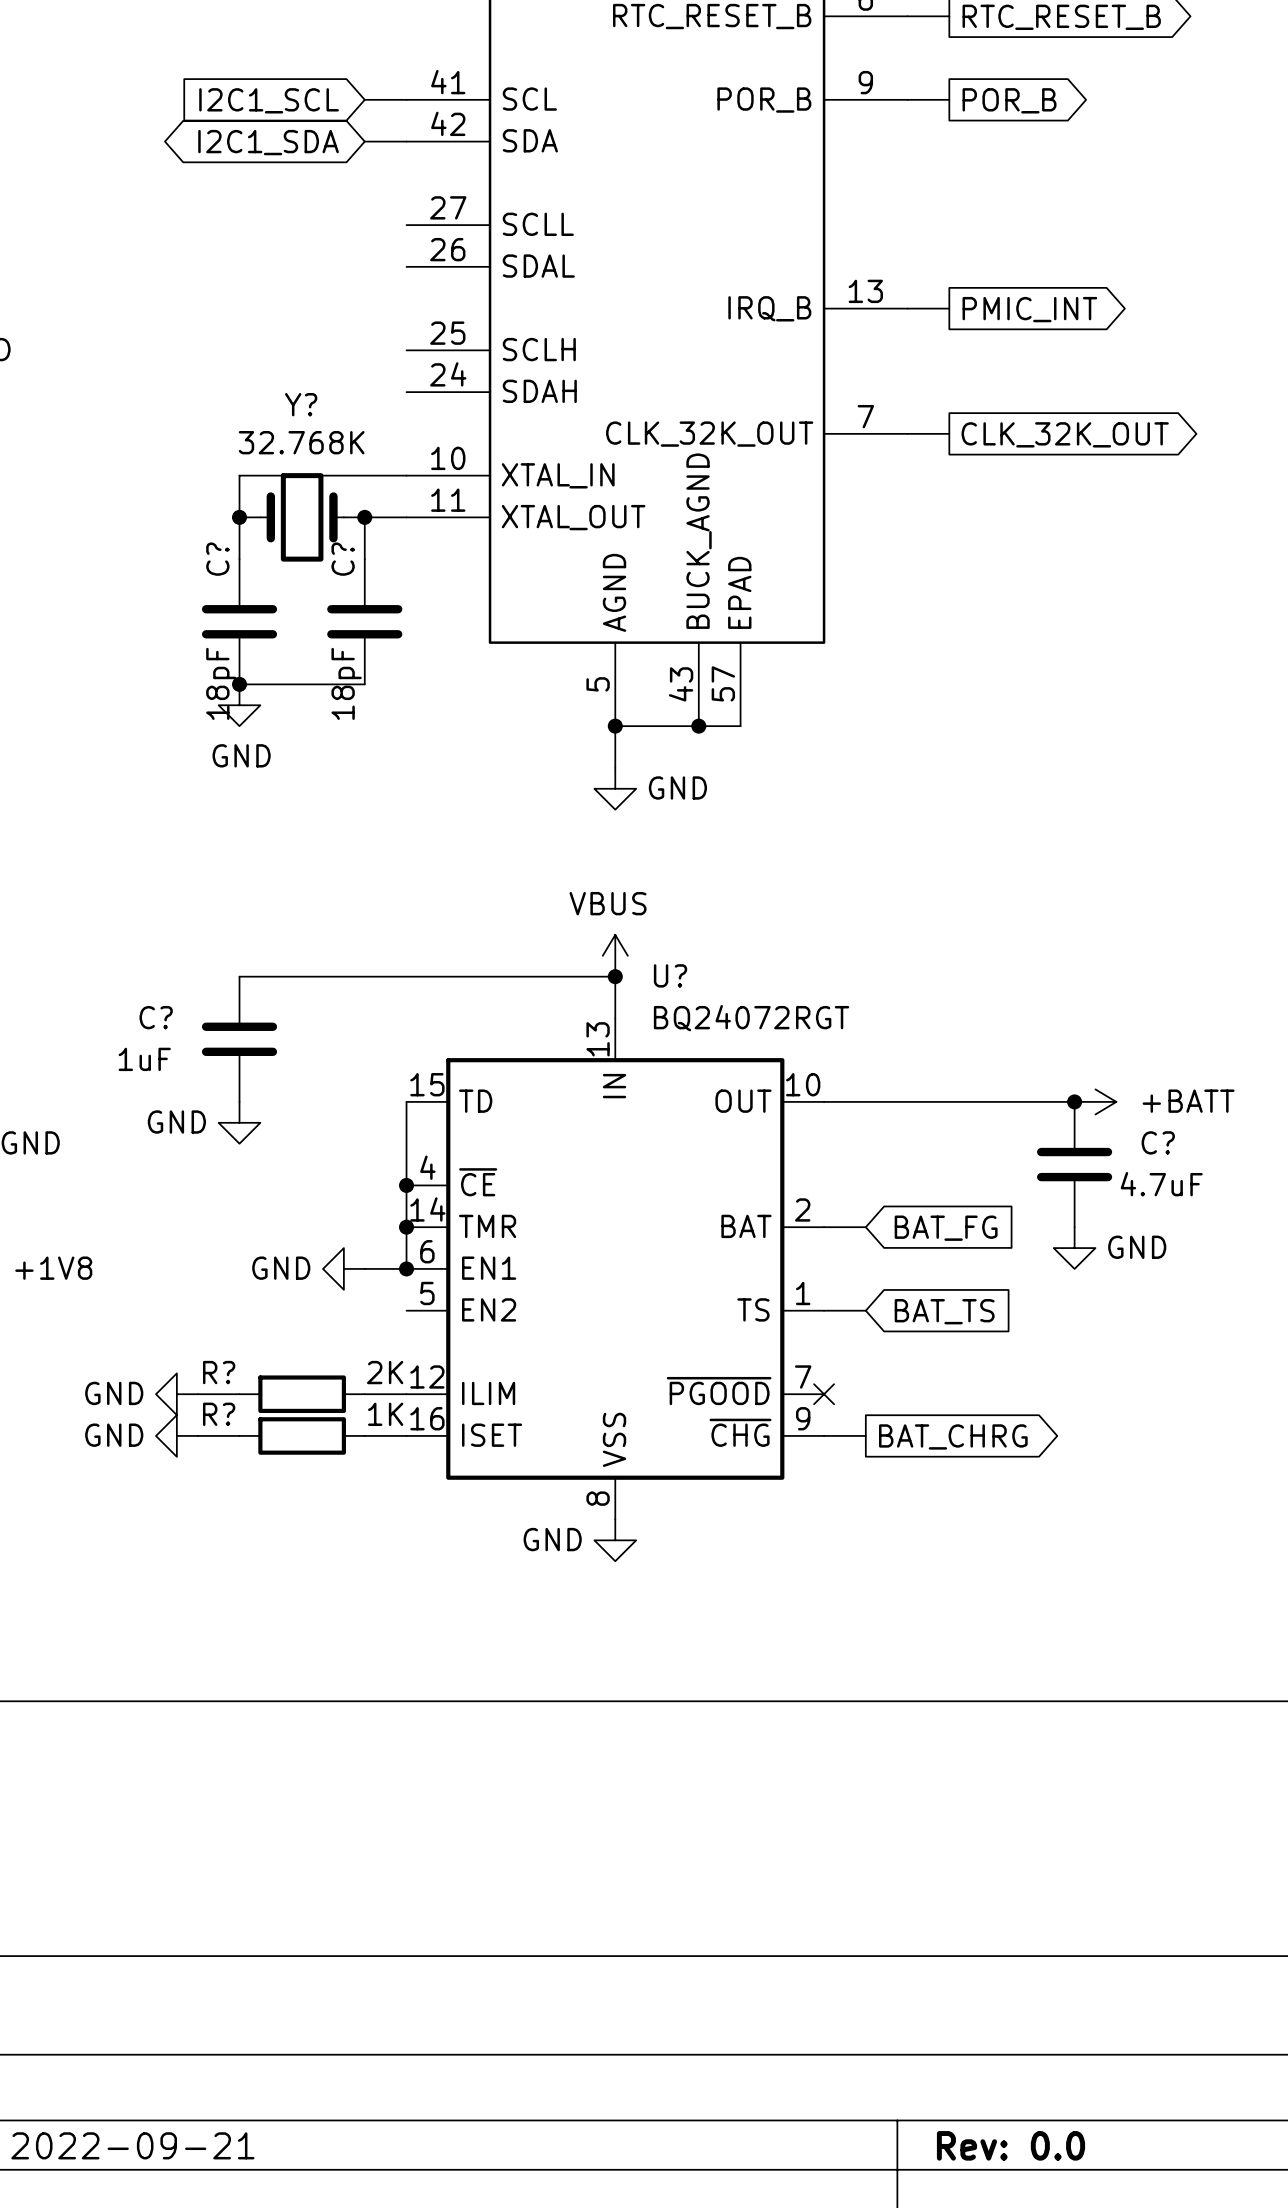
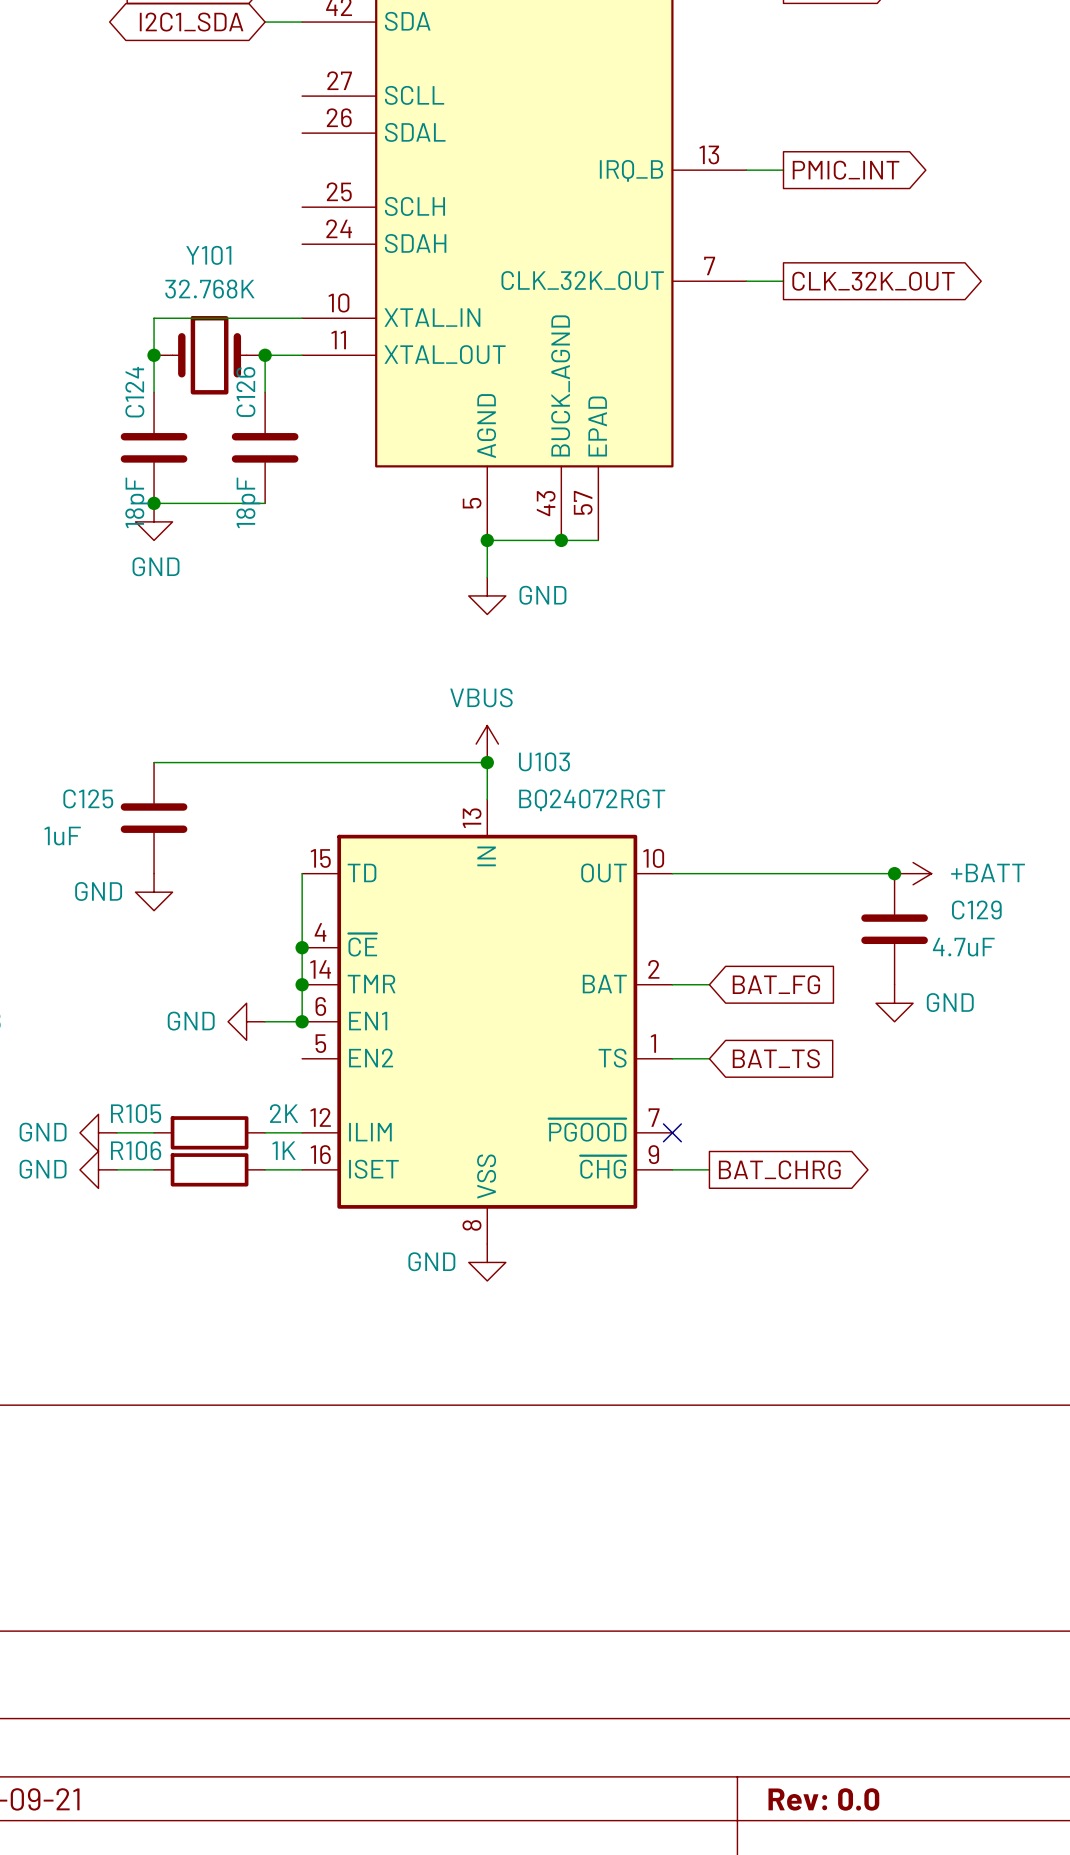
Y? name: Y? (301, 404) -> Y101 (208, 255)
C? name: C? (217, 559) -> C124 (134, 392)
C? name: C? (343, 559) -> C126 (245, 392)
U? name: U? (670, 975) -> U103 (544, 761)
C? name: C? (156, 1017) -> C125 (88, 798)
C? name: C? (1158, 1142) -> C129 (976, 910)
R? name: R? (219, 1372) -> R105 (136, 1113)
R? name: R? (219, 1414) -> R106 (136, 1150)

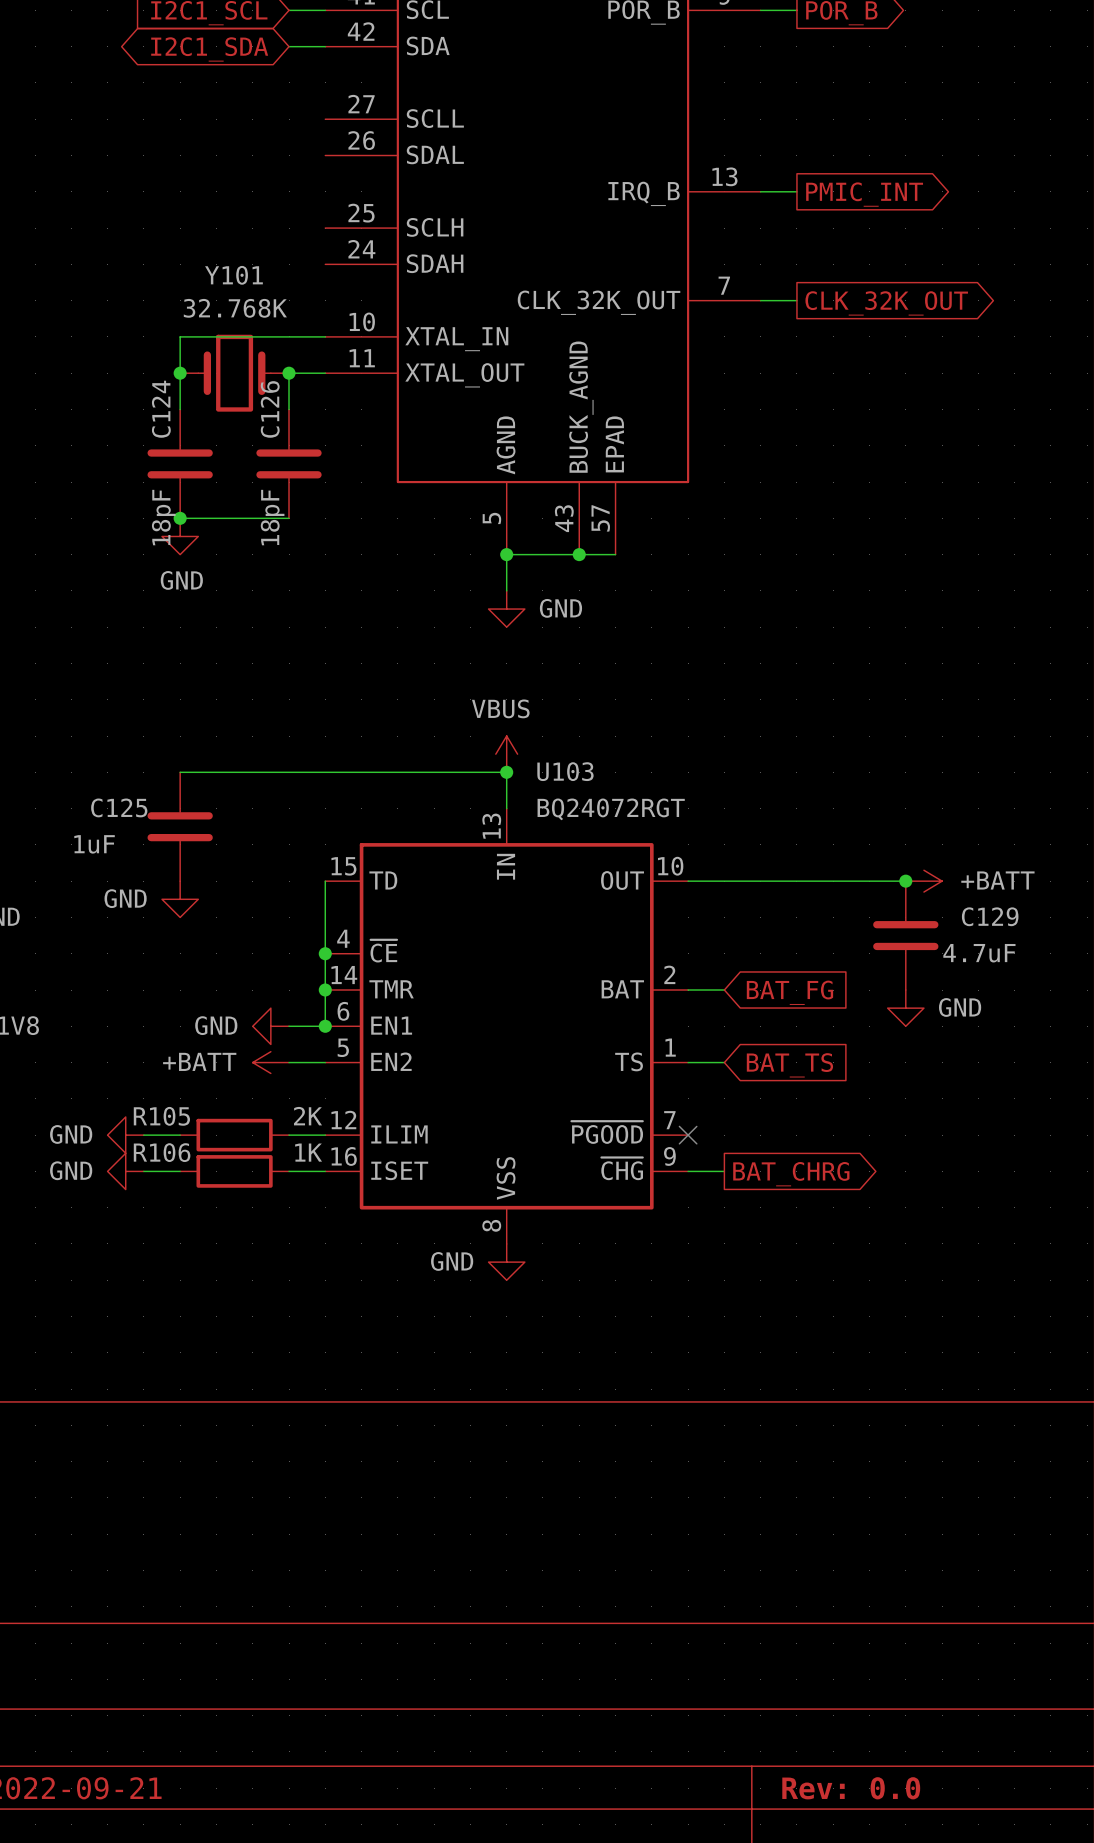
power symbol: none -> +BATT (270, 1062)
wire: none -> (289, 1062) (325, 1062)

